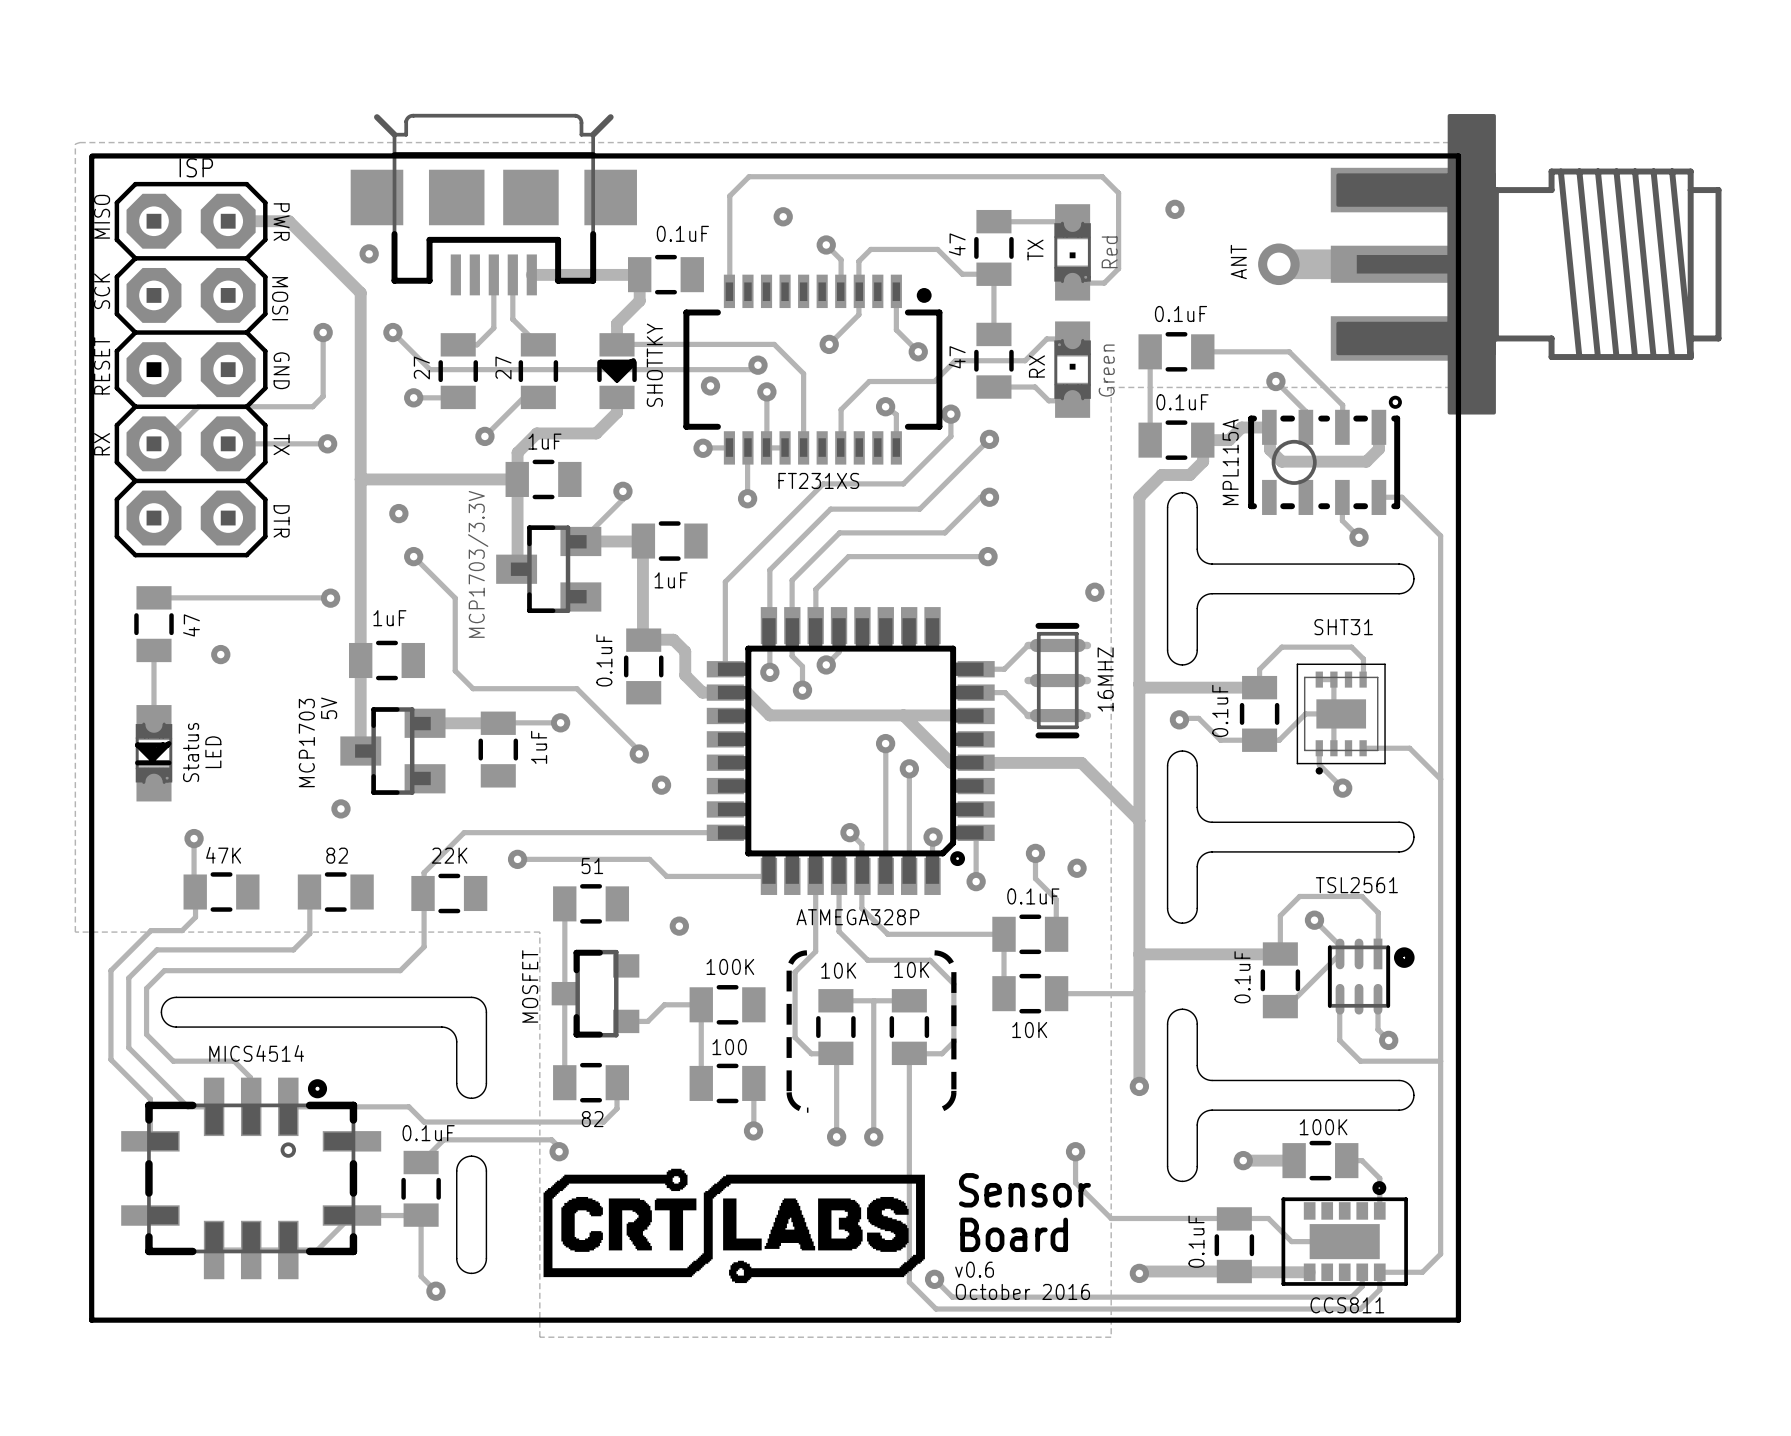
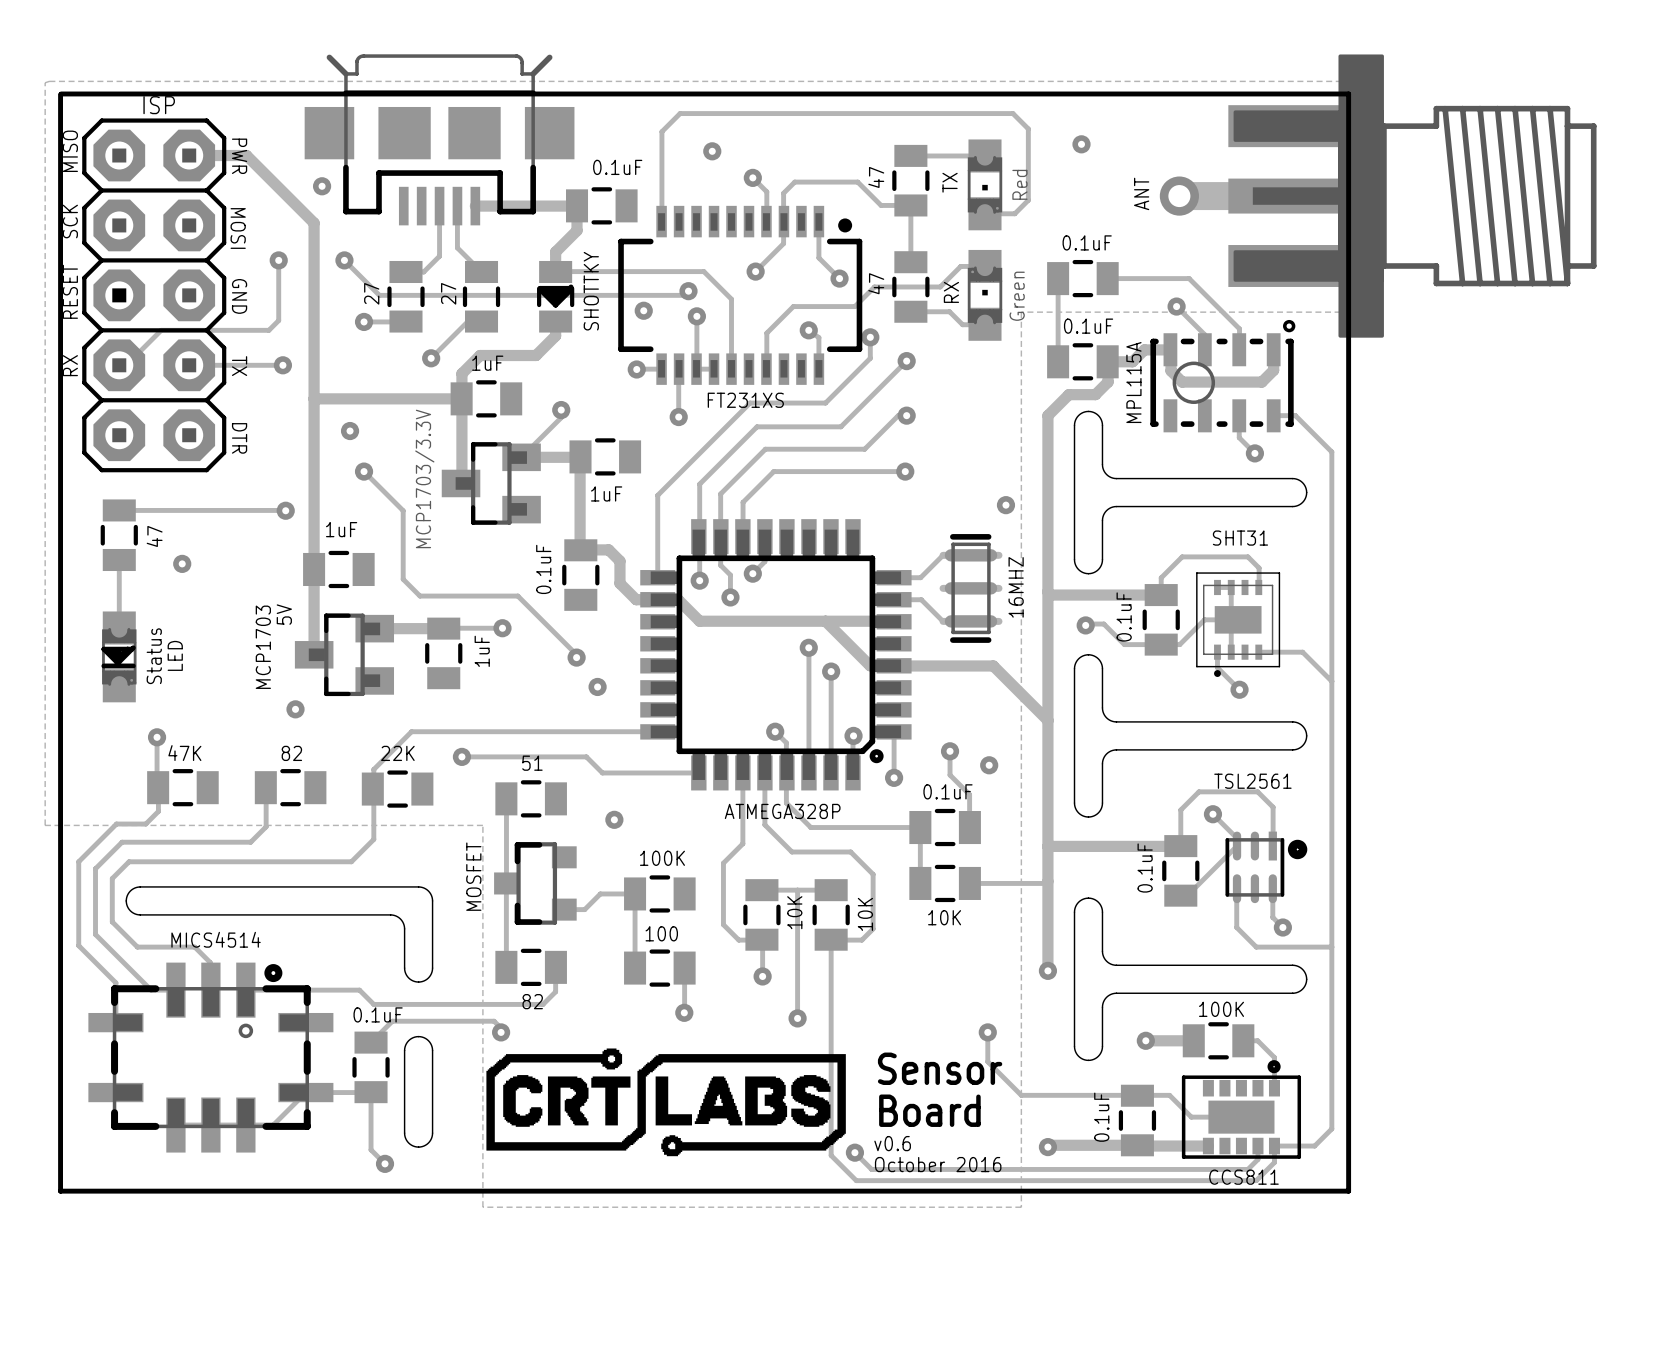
line: (806, 952) (794, 958) (789, 968) (789, 1092) (794, 1104) (800, 1108) (808, 1110) -> none
line: (934, 952) (948, 958) (953, 969) (953, 1089) -> none
part value rotation: 0° (911, 969) -> 90° counterclockwise (865, 914)
part value position: 10K (911, 969) -> 10K (865, 914)
part value rotation: 0° (838, 970) -> 90° counterclockwise (794, 912)
part value position: 10K (838, 970) -> 10K (794, 912)
line: (953, 1090) (952, 1099) (948, 1104) (936, 1110) -> none
track: (836, 1092) (836, 1136) -> none
via position: (836, 1136) -> (762, 976)

